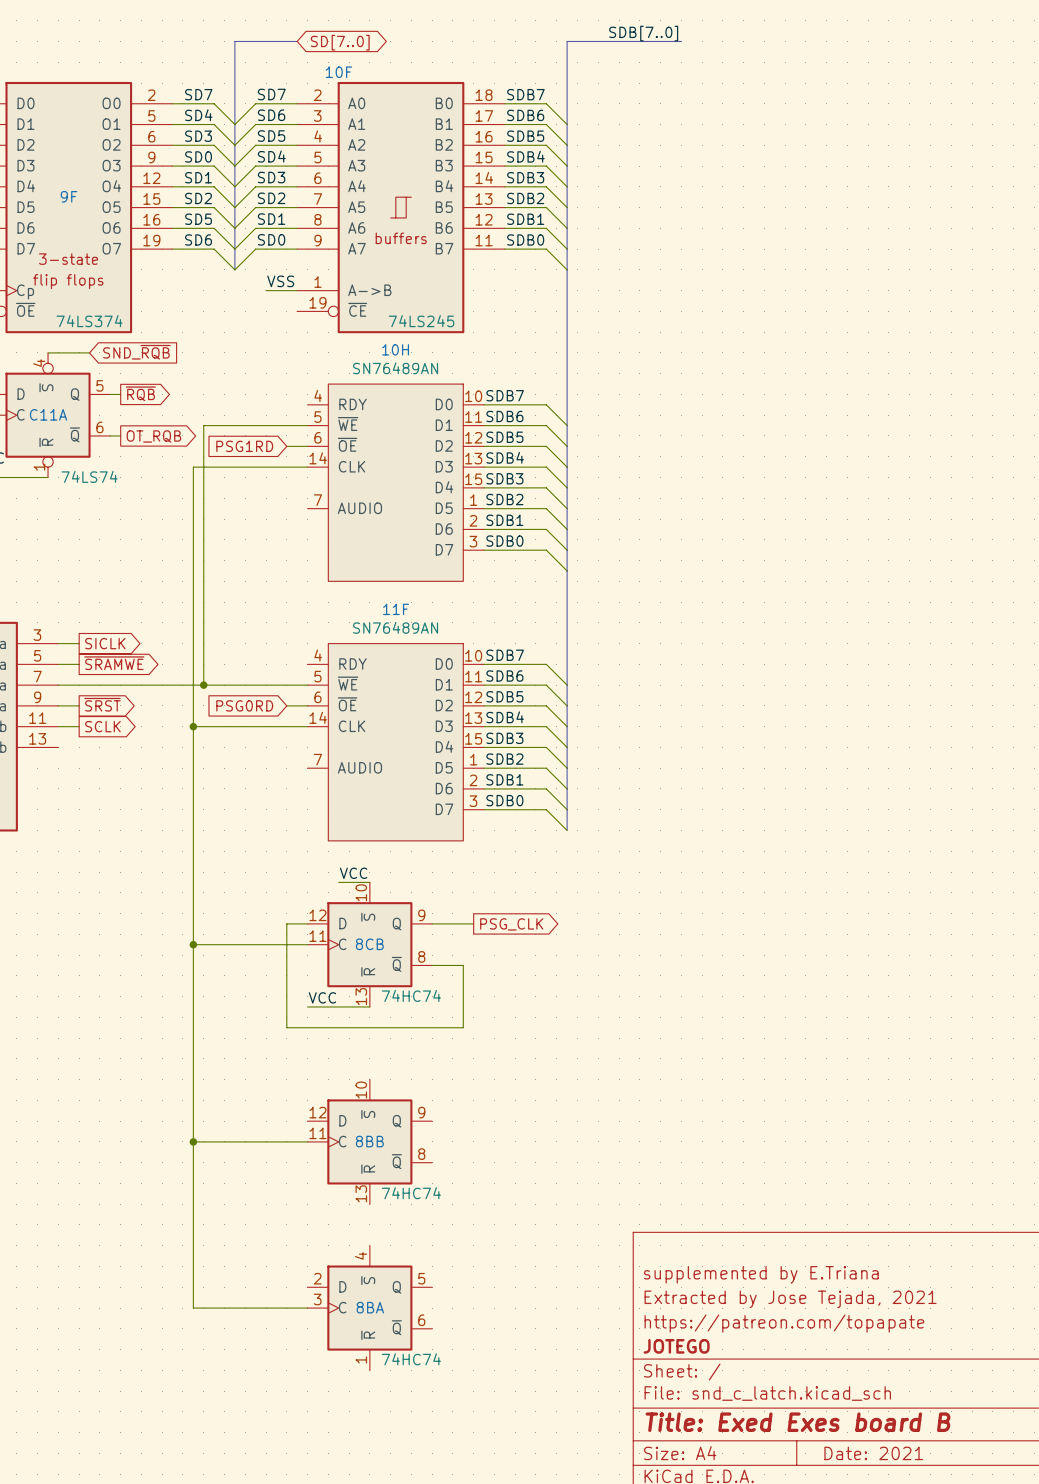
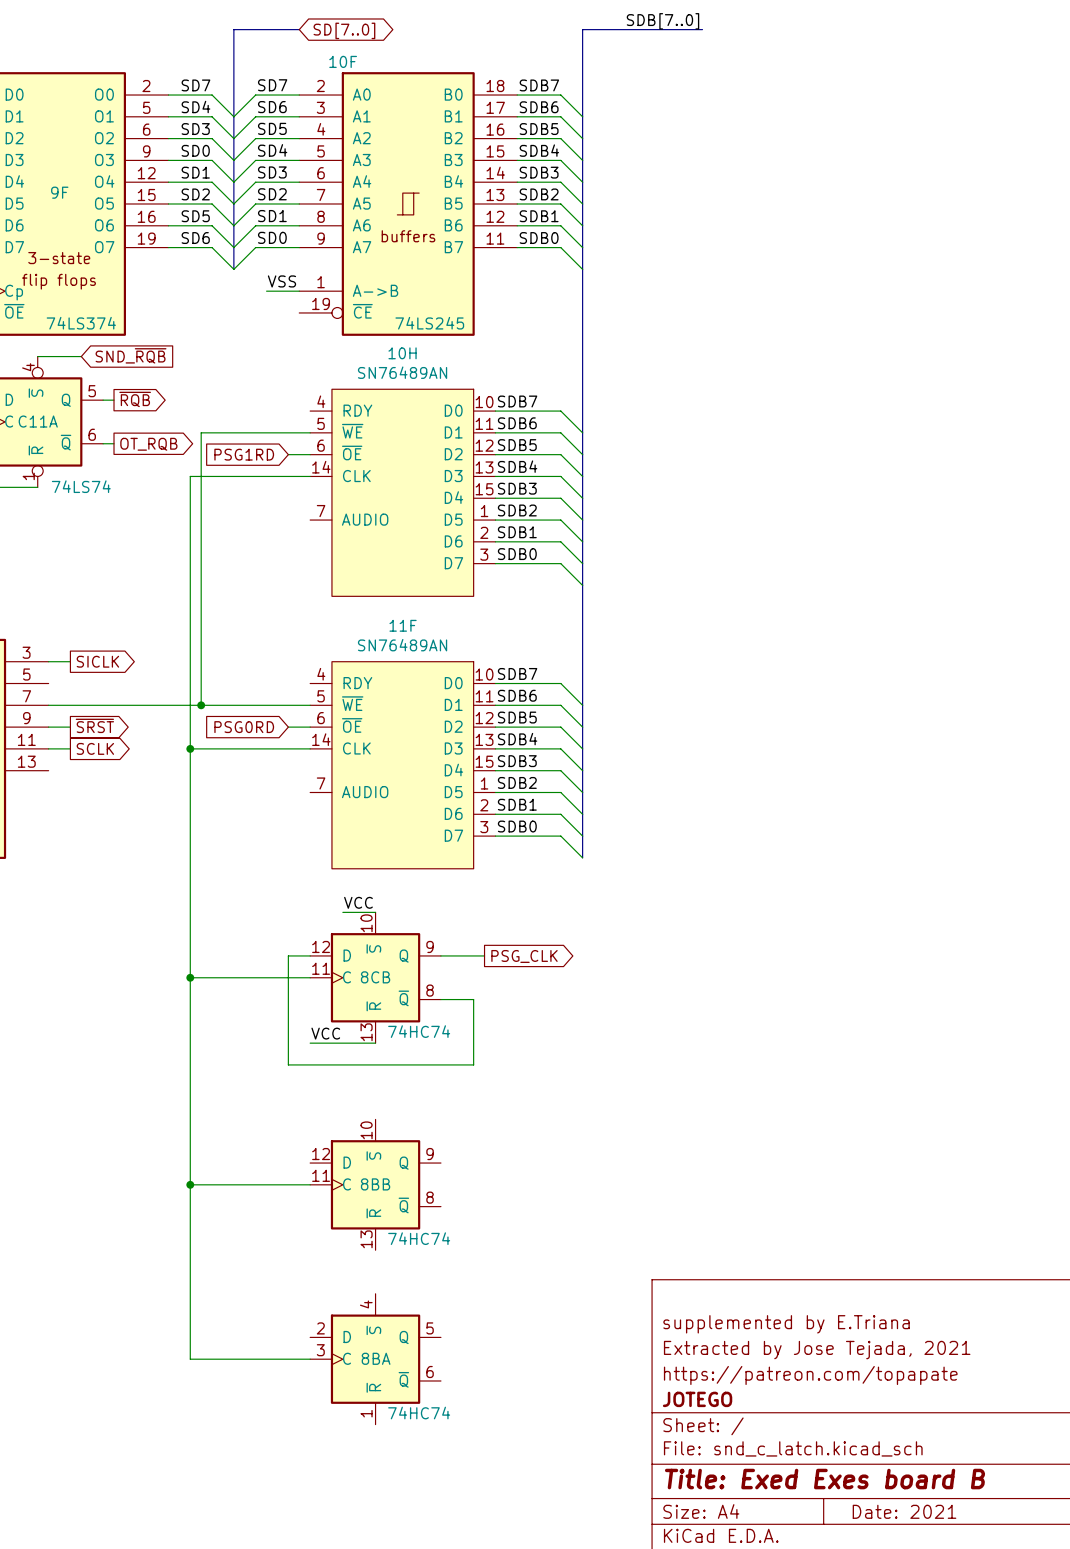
global label: ~{SRAMWE} (114, 663) -> none
wire: (58, 664) (79, 664) -> none

